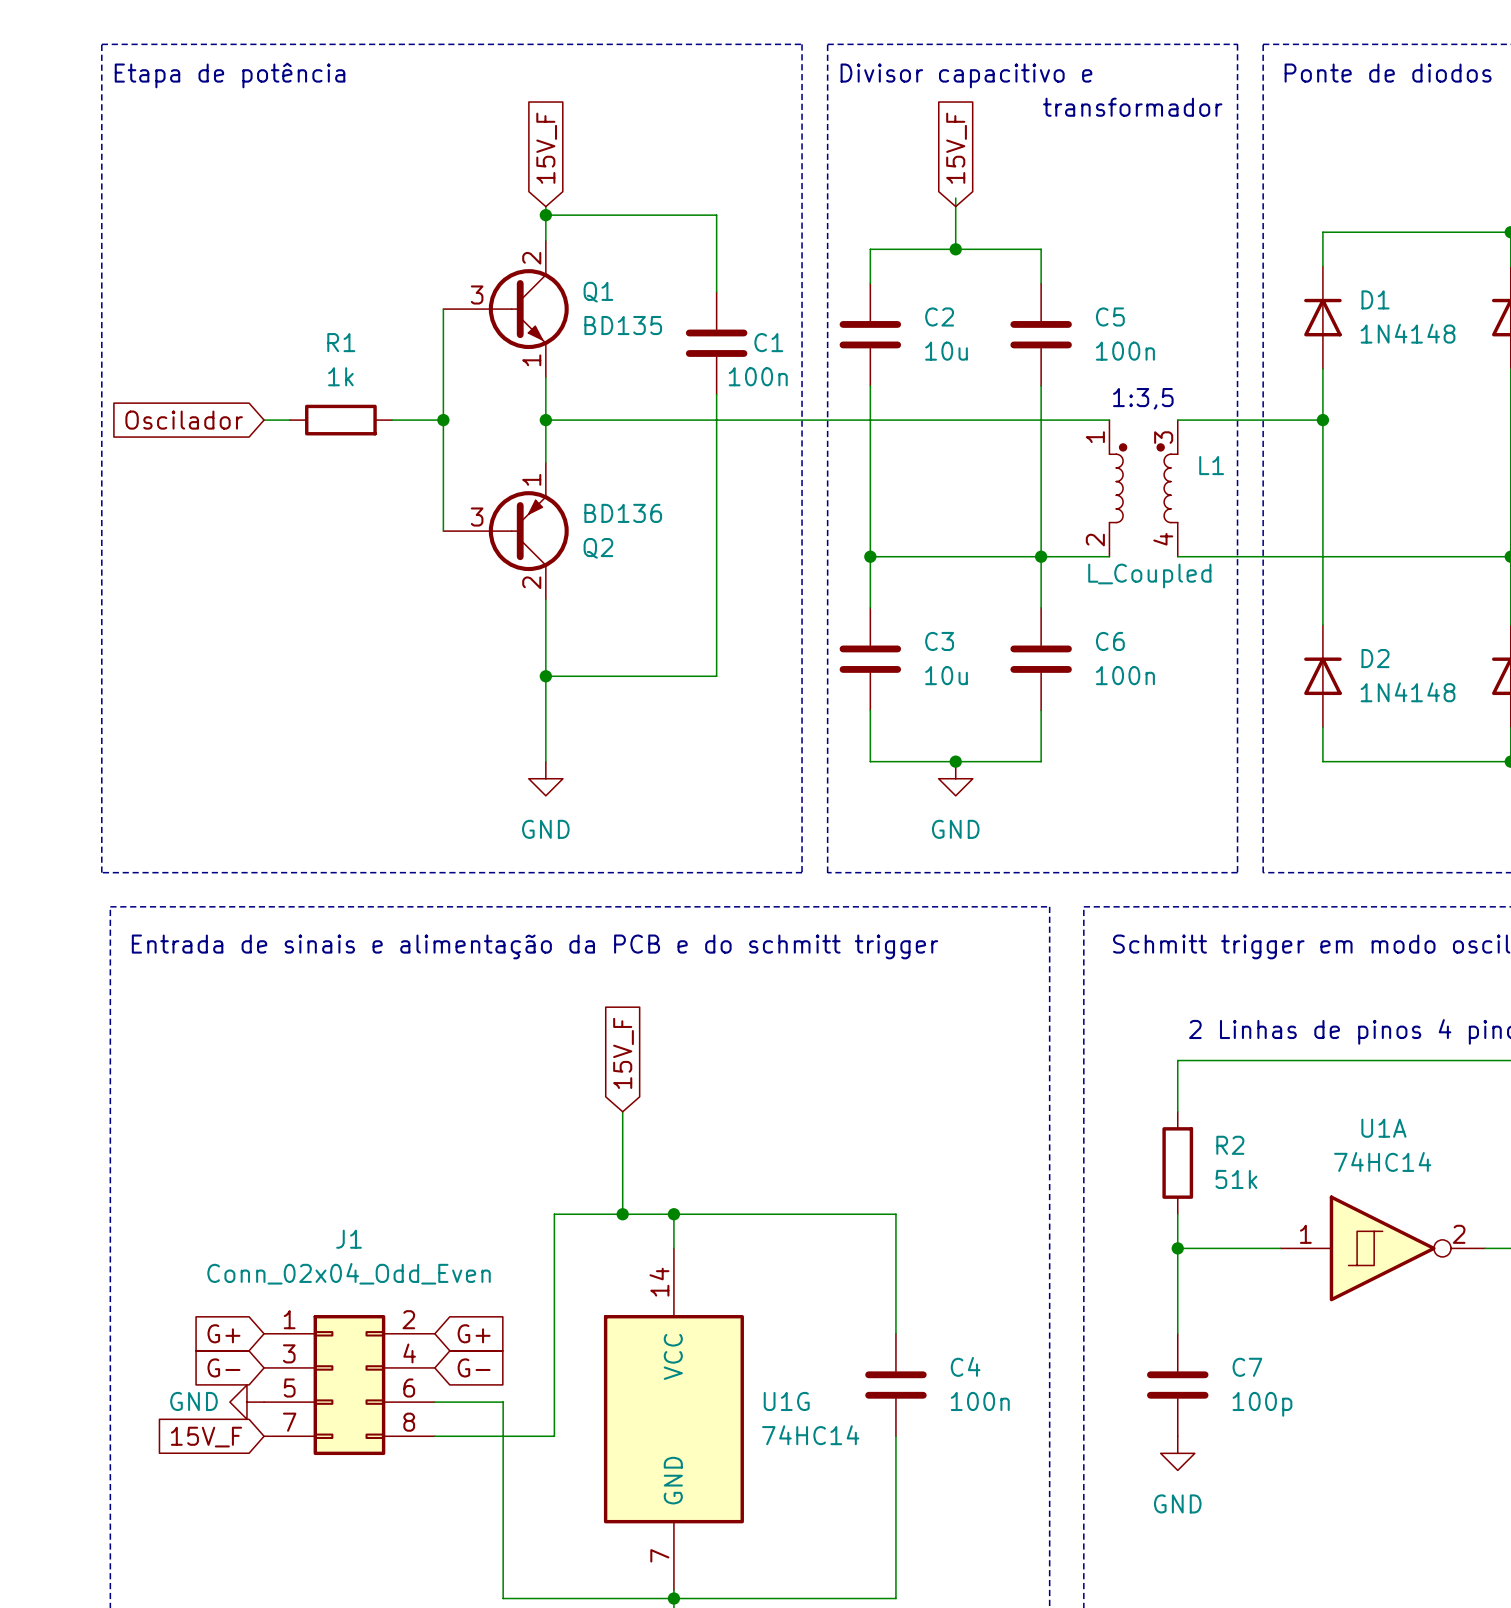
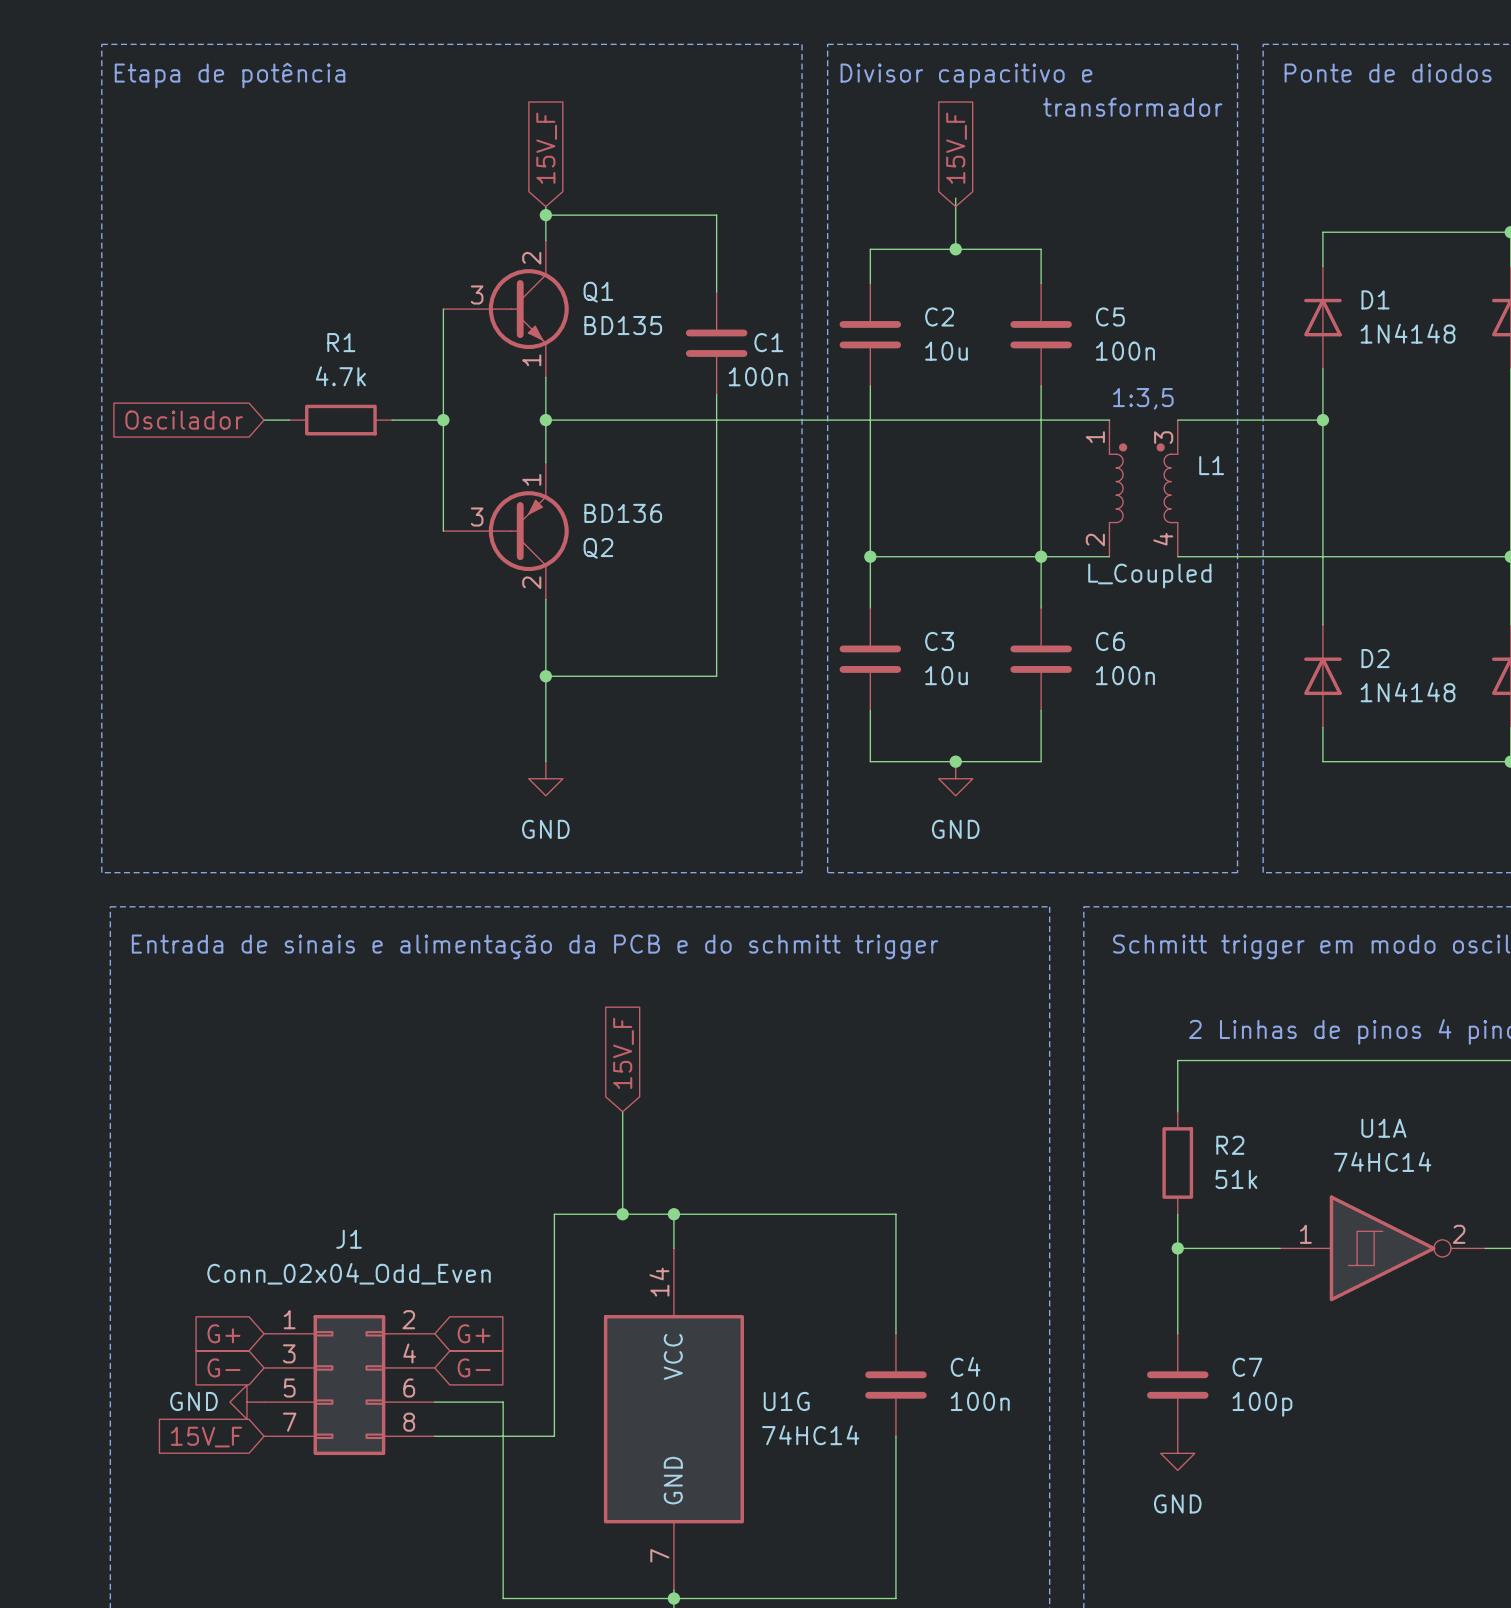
R1 value: 1k (340, 376) -> 4.7k (340, 376)

